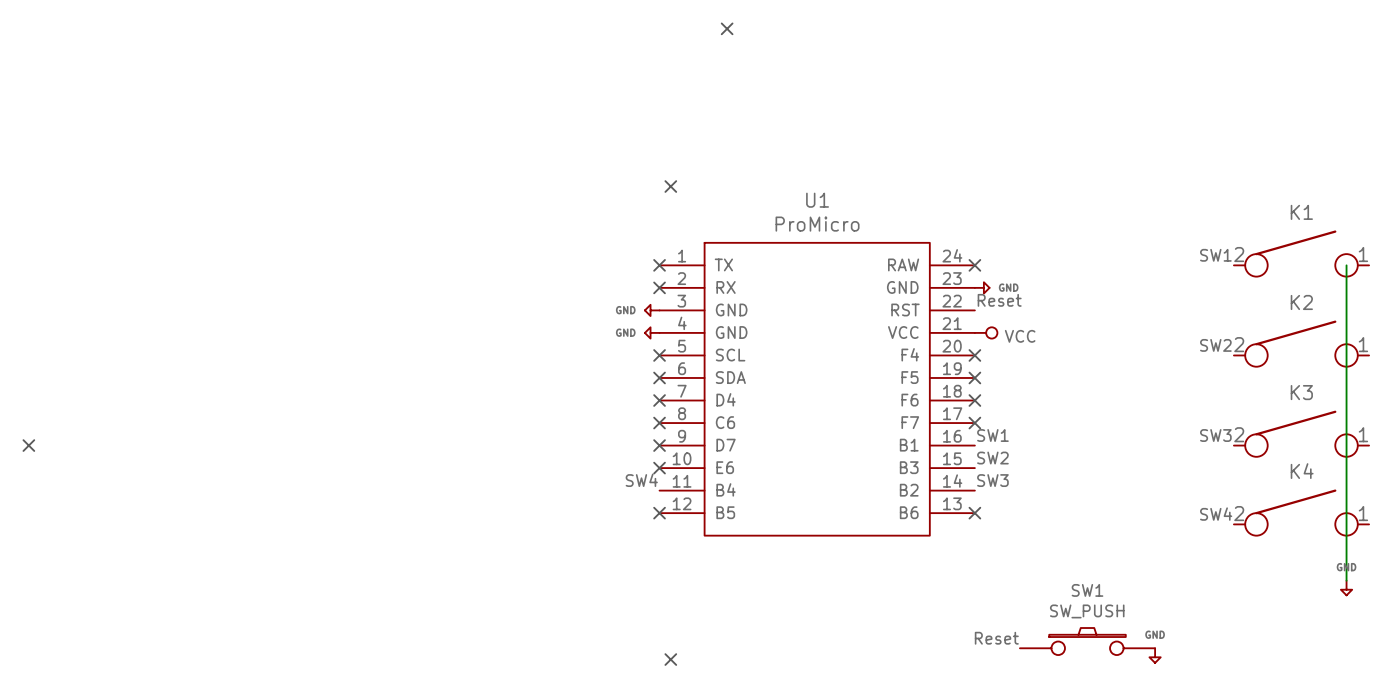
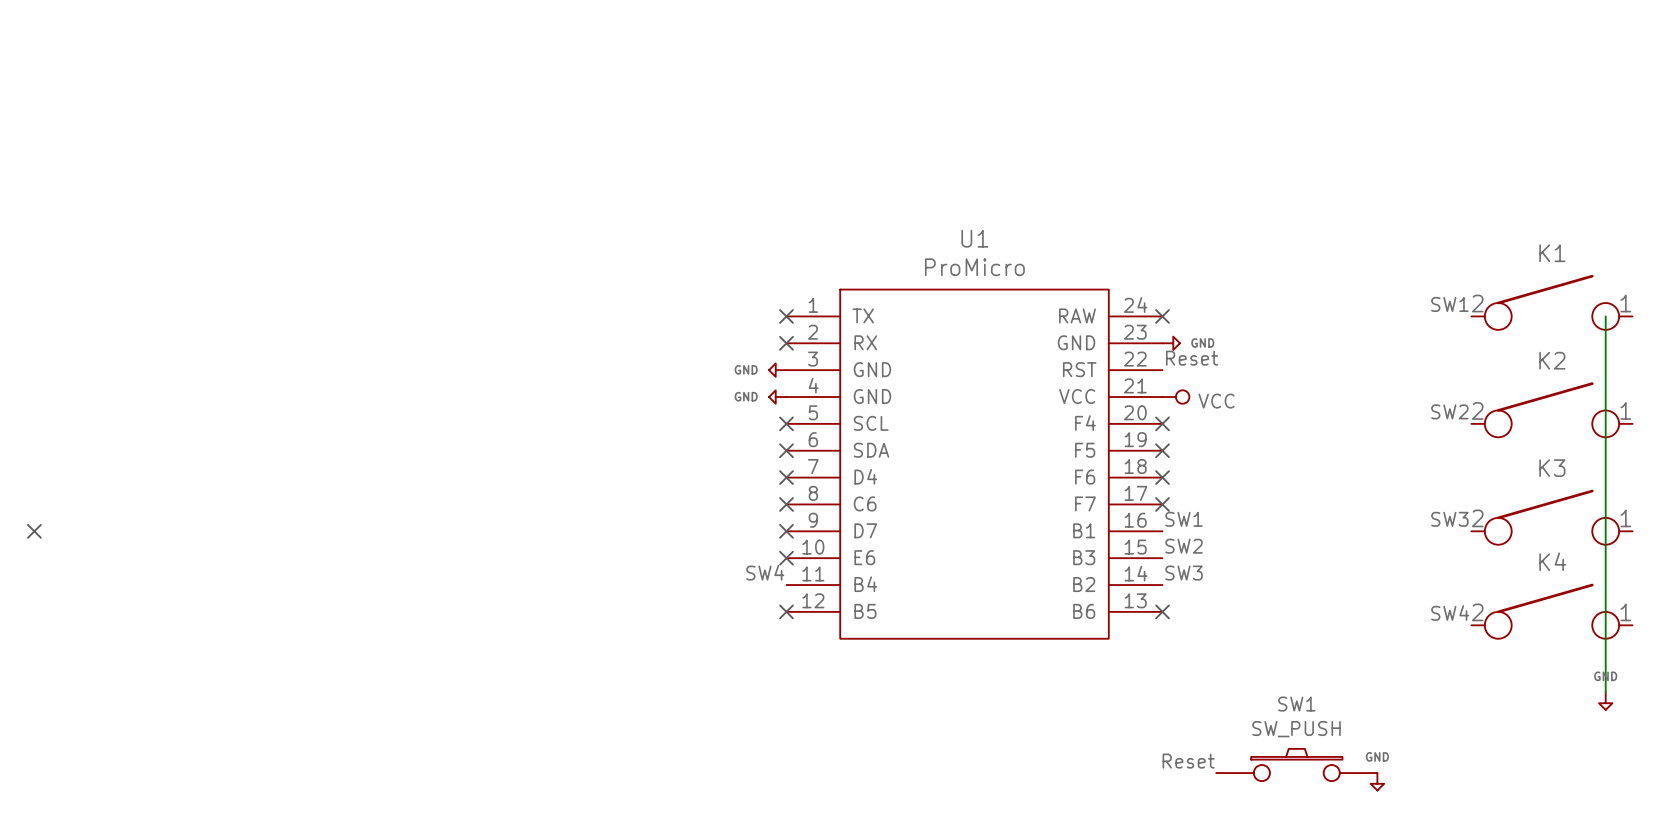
no-connect mark: (727, 28) -> none
no-connect mark: (670, 186) -> none
no-connect mark: (670, 659) -> none

